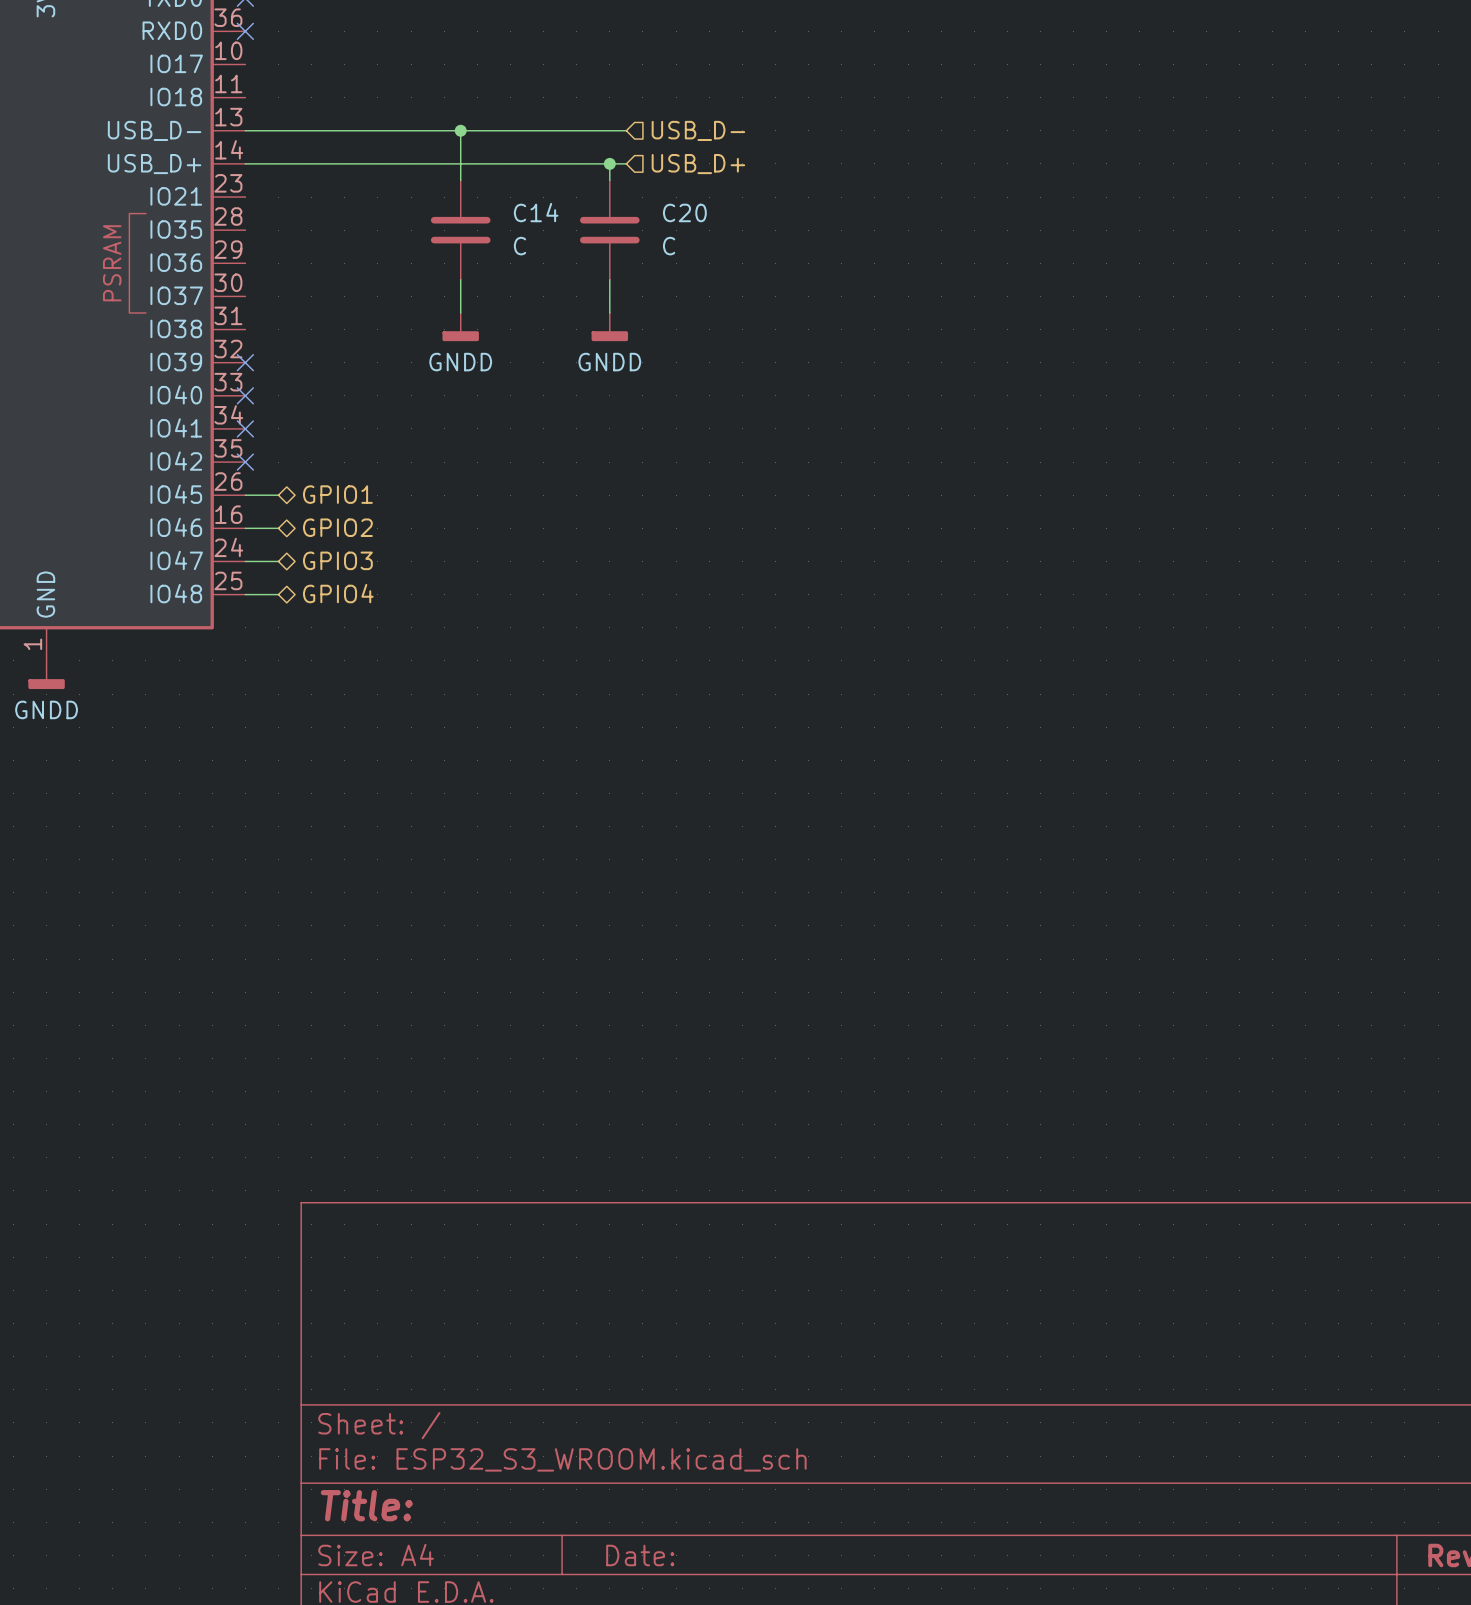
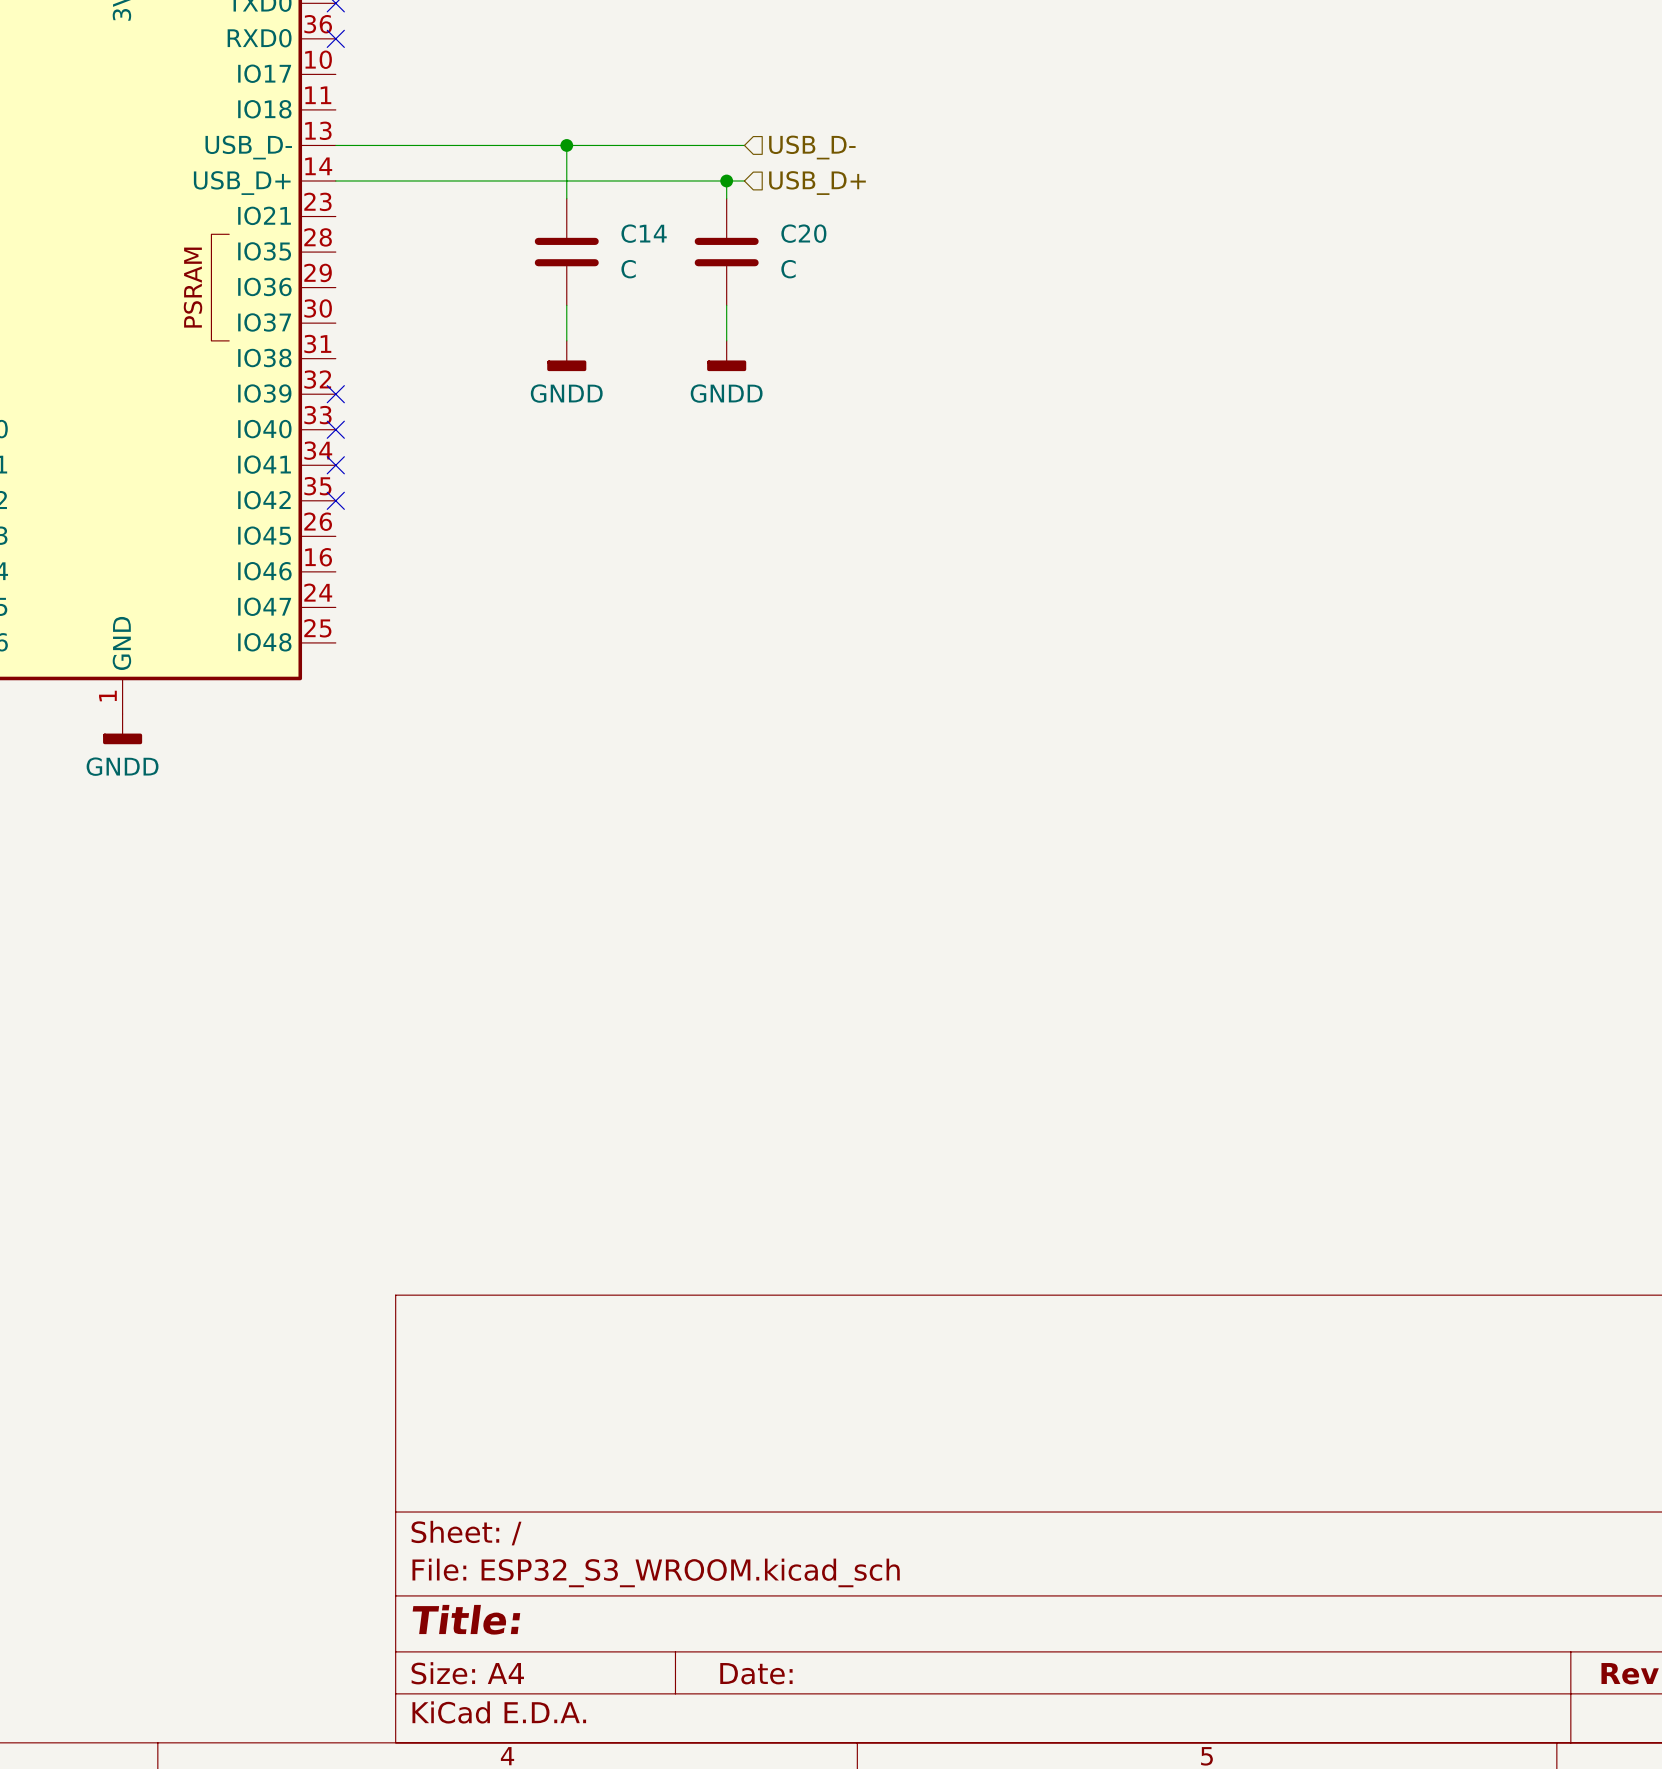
hierarchical label: GPIO1 (337, 494) -> none
wire: (245, 495) (278, 495) -> none
hierarchical label: GPIO2 (337, 527) -> none
wire: (245, 528) (278, 528) -> none
hierarchical label: GPIO3 (337, 560) -> none
wire: (245, 561) (278, 561) -> none
hierarchical label: GPIO4 (338, 593) -> none
wire: (245, 594) (278, 594) -> none

